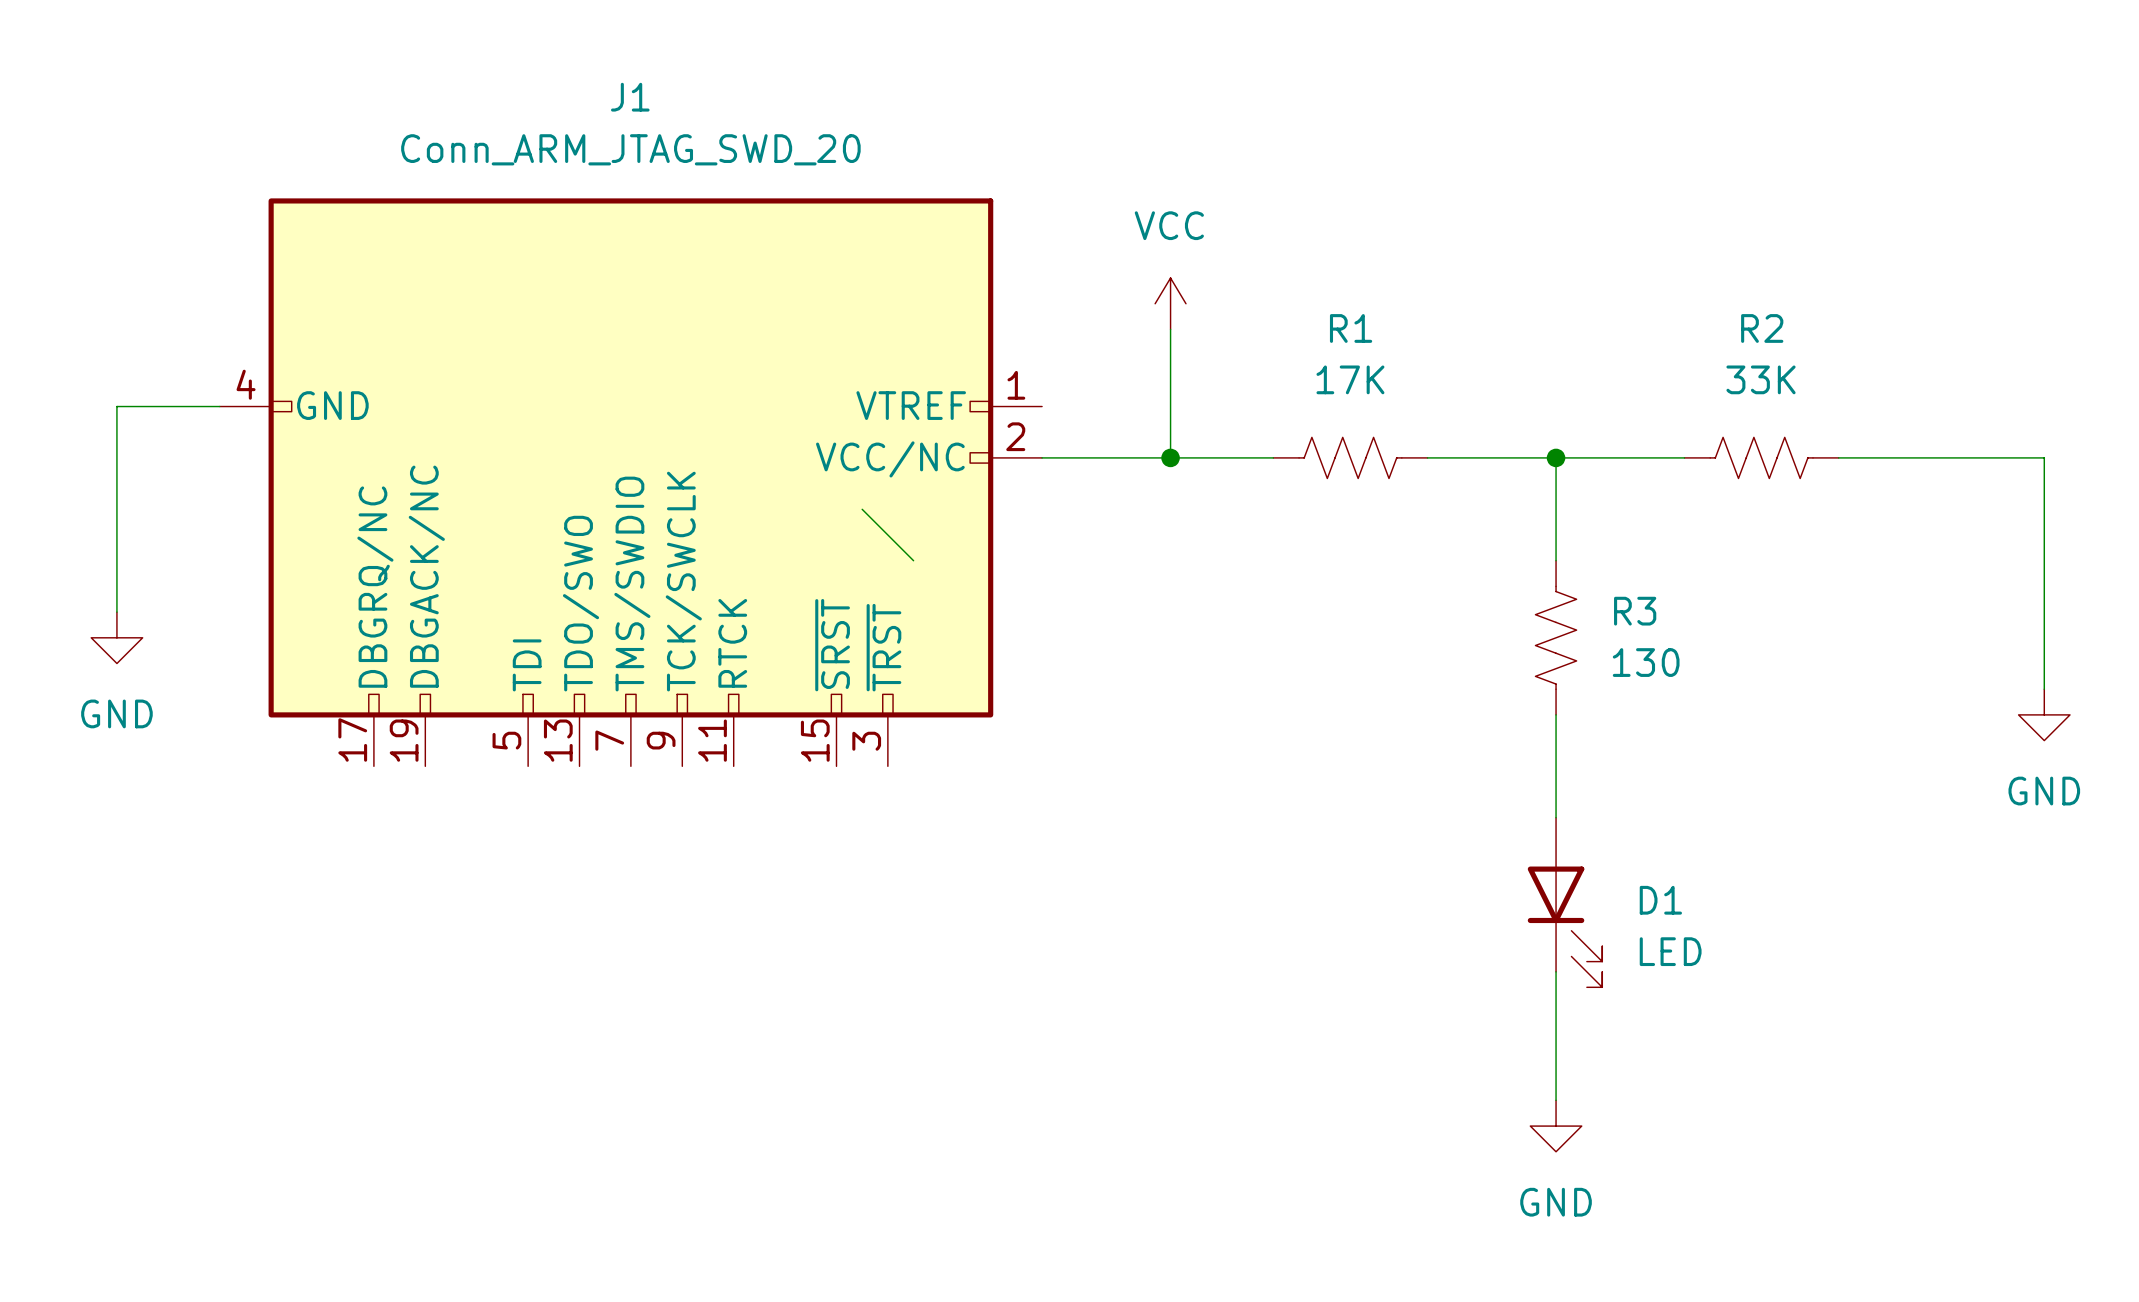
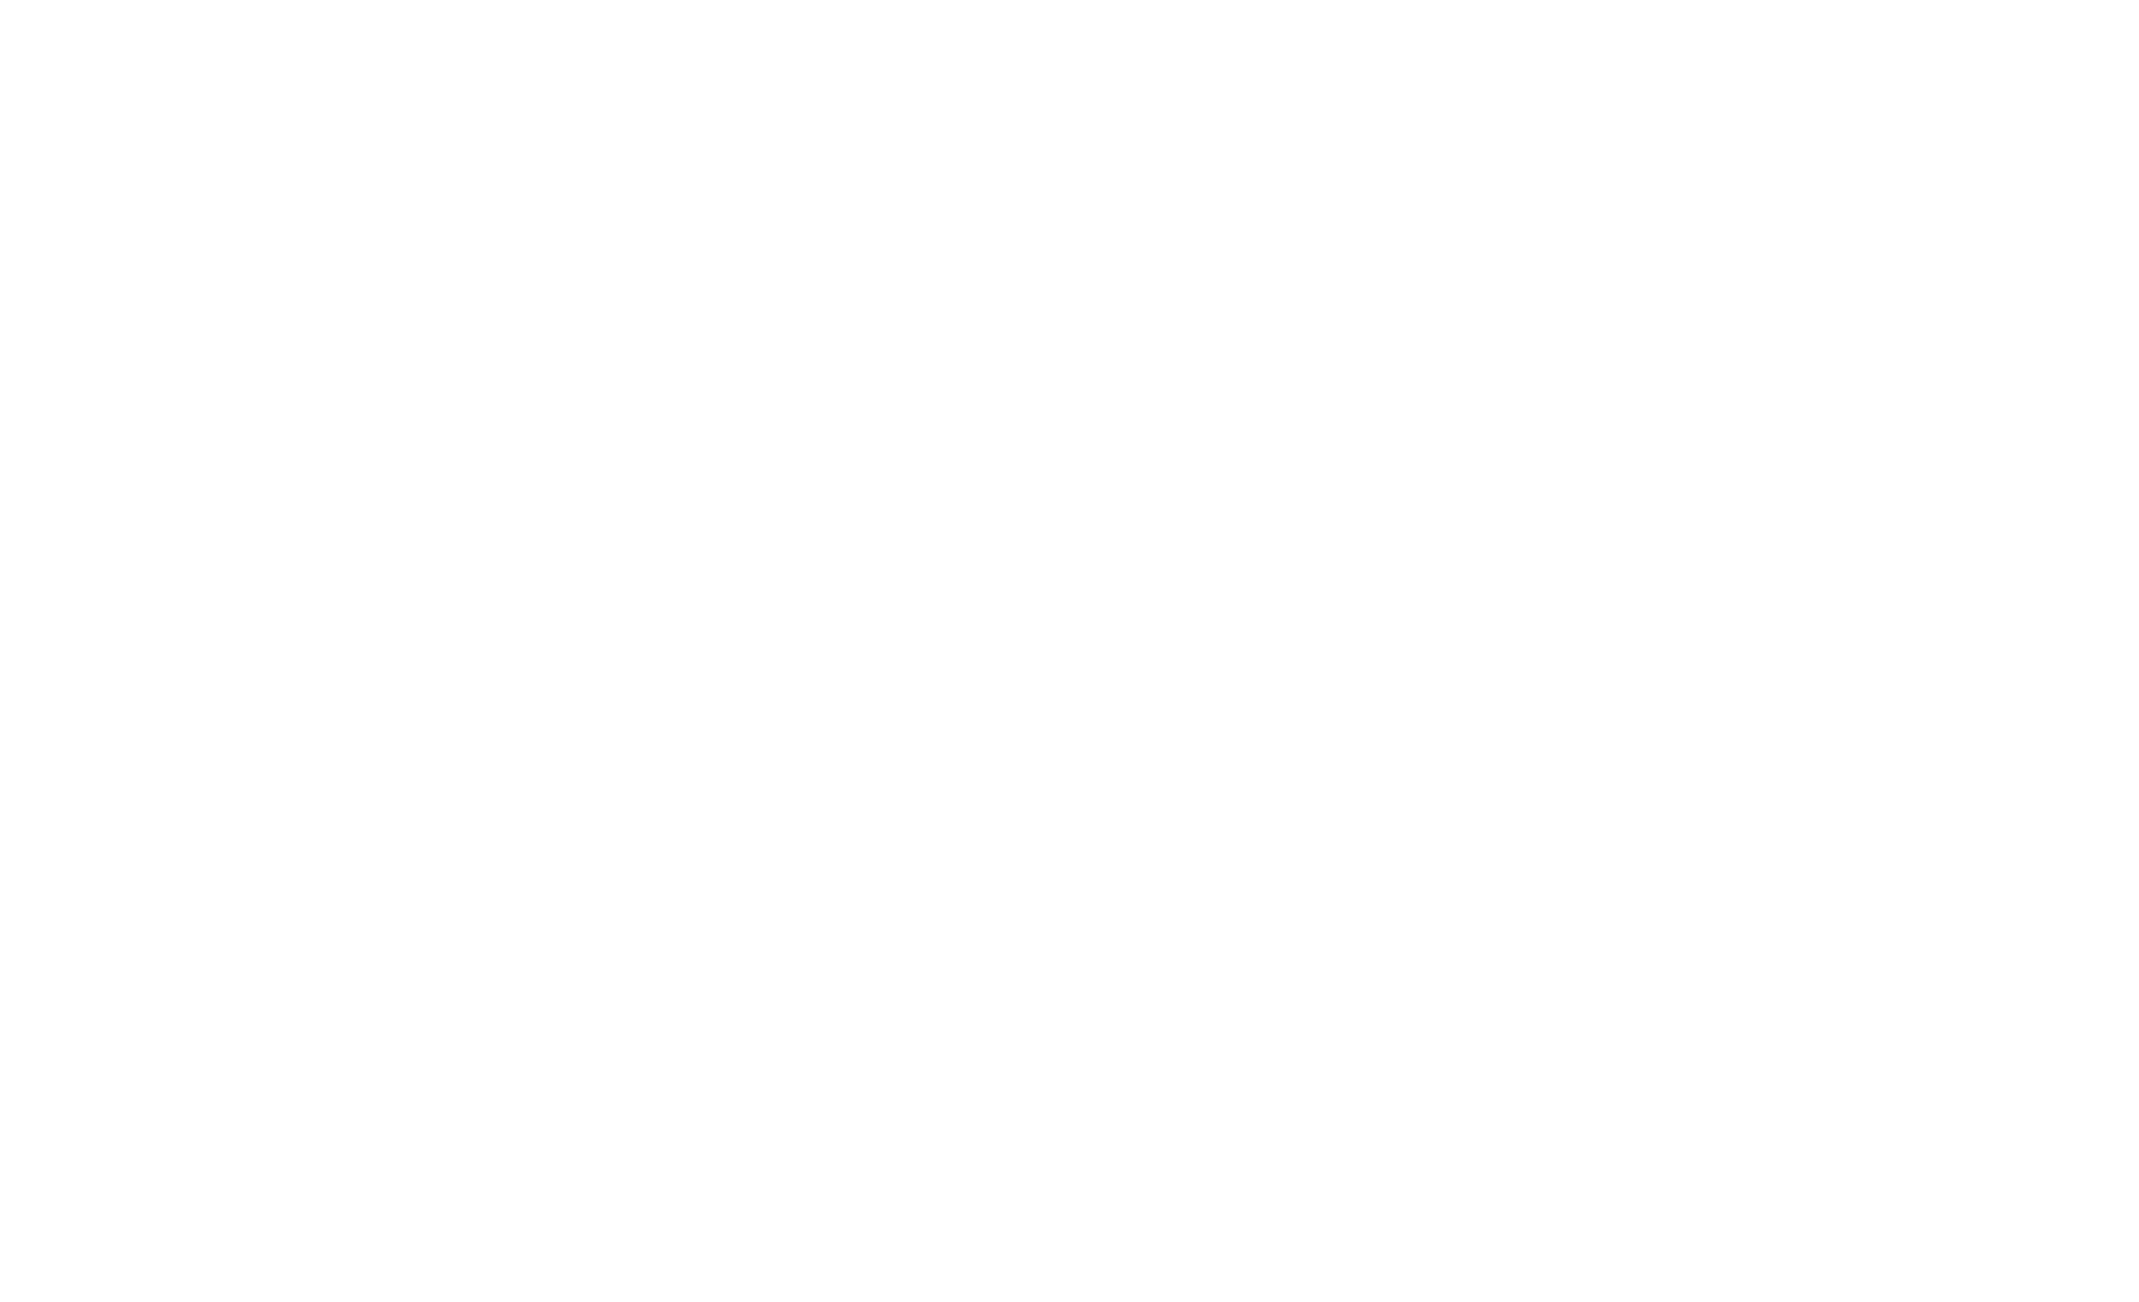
power symbol: VCC (1170, 303) -> none
wire: (1170, 329) (1170, 457) -> none
wire: (219, 406) (116, 406) (116, 612) -> none
wire: (1042, 457) (1273, 457) -> none
junction: (1170, 457) -> none
R1: 17K (1350, 457) -> none
wire: (1427, 457) (1684, 457) -> none
wire: (1556, 457) (1556, 560) -> none
junction: (1556, 457) -> none
R2: 33K (1761, 457) -> none
wire: (1838, 457) (2044, 457) (2044, 689) -> none
J1: Conn_ARM_JTAG_SWD_20 (630, 482) -> none
wire: (862, 509) (913, 560) -> none
power symbol: GND (116, 637) -> none
R3: 130 (1556, 637) -> none
wire: (1556, 714) (1556, 817) -> none
power symbol: GND (2044, 714) -> none
D1: LED (1565, 902) -> none
wire: (1556, 971) (1556, 1100) -> none
power symbol: GND (1556, 1126) -> none

